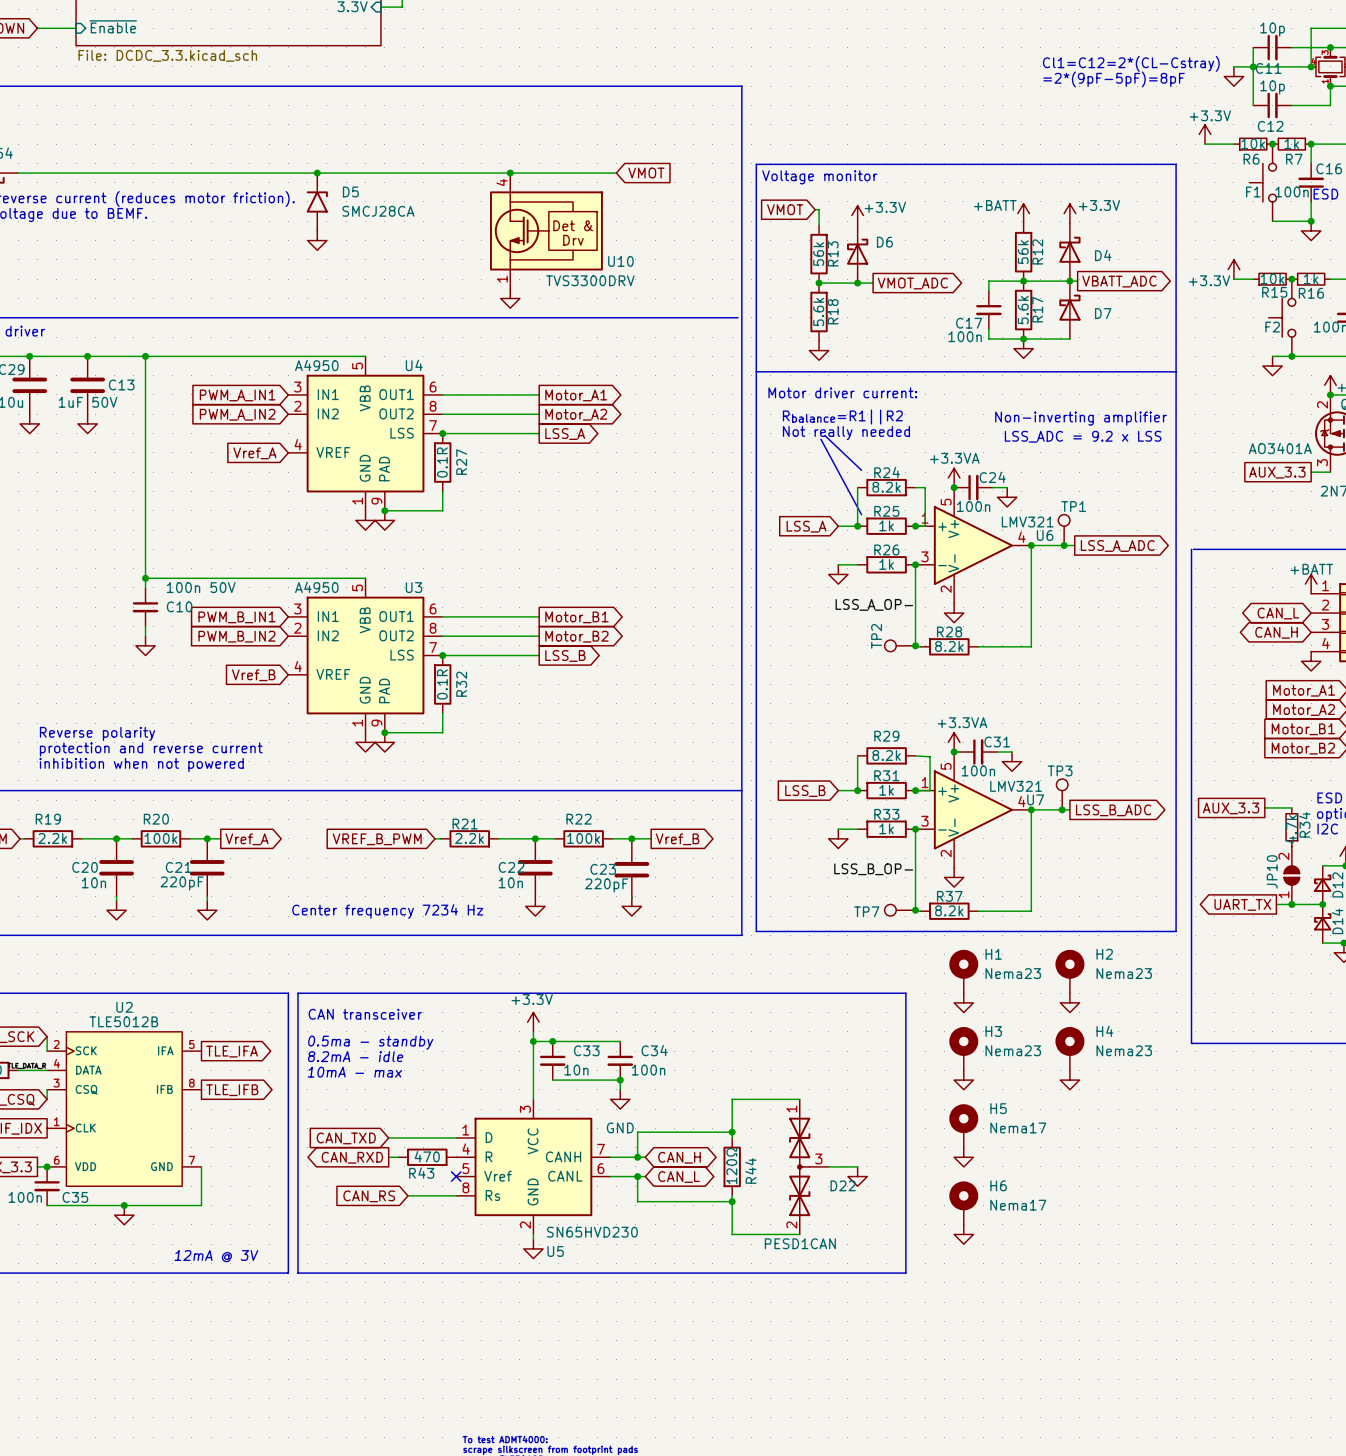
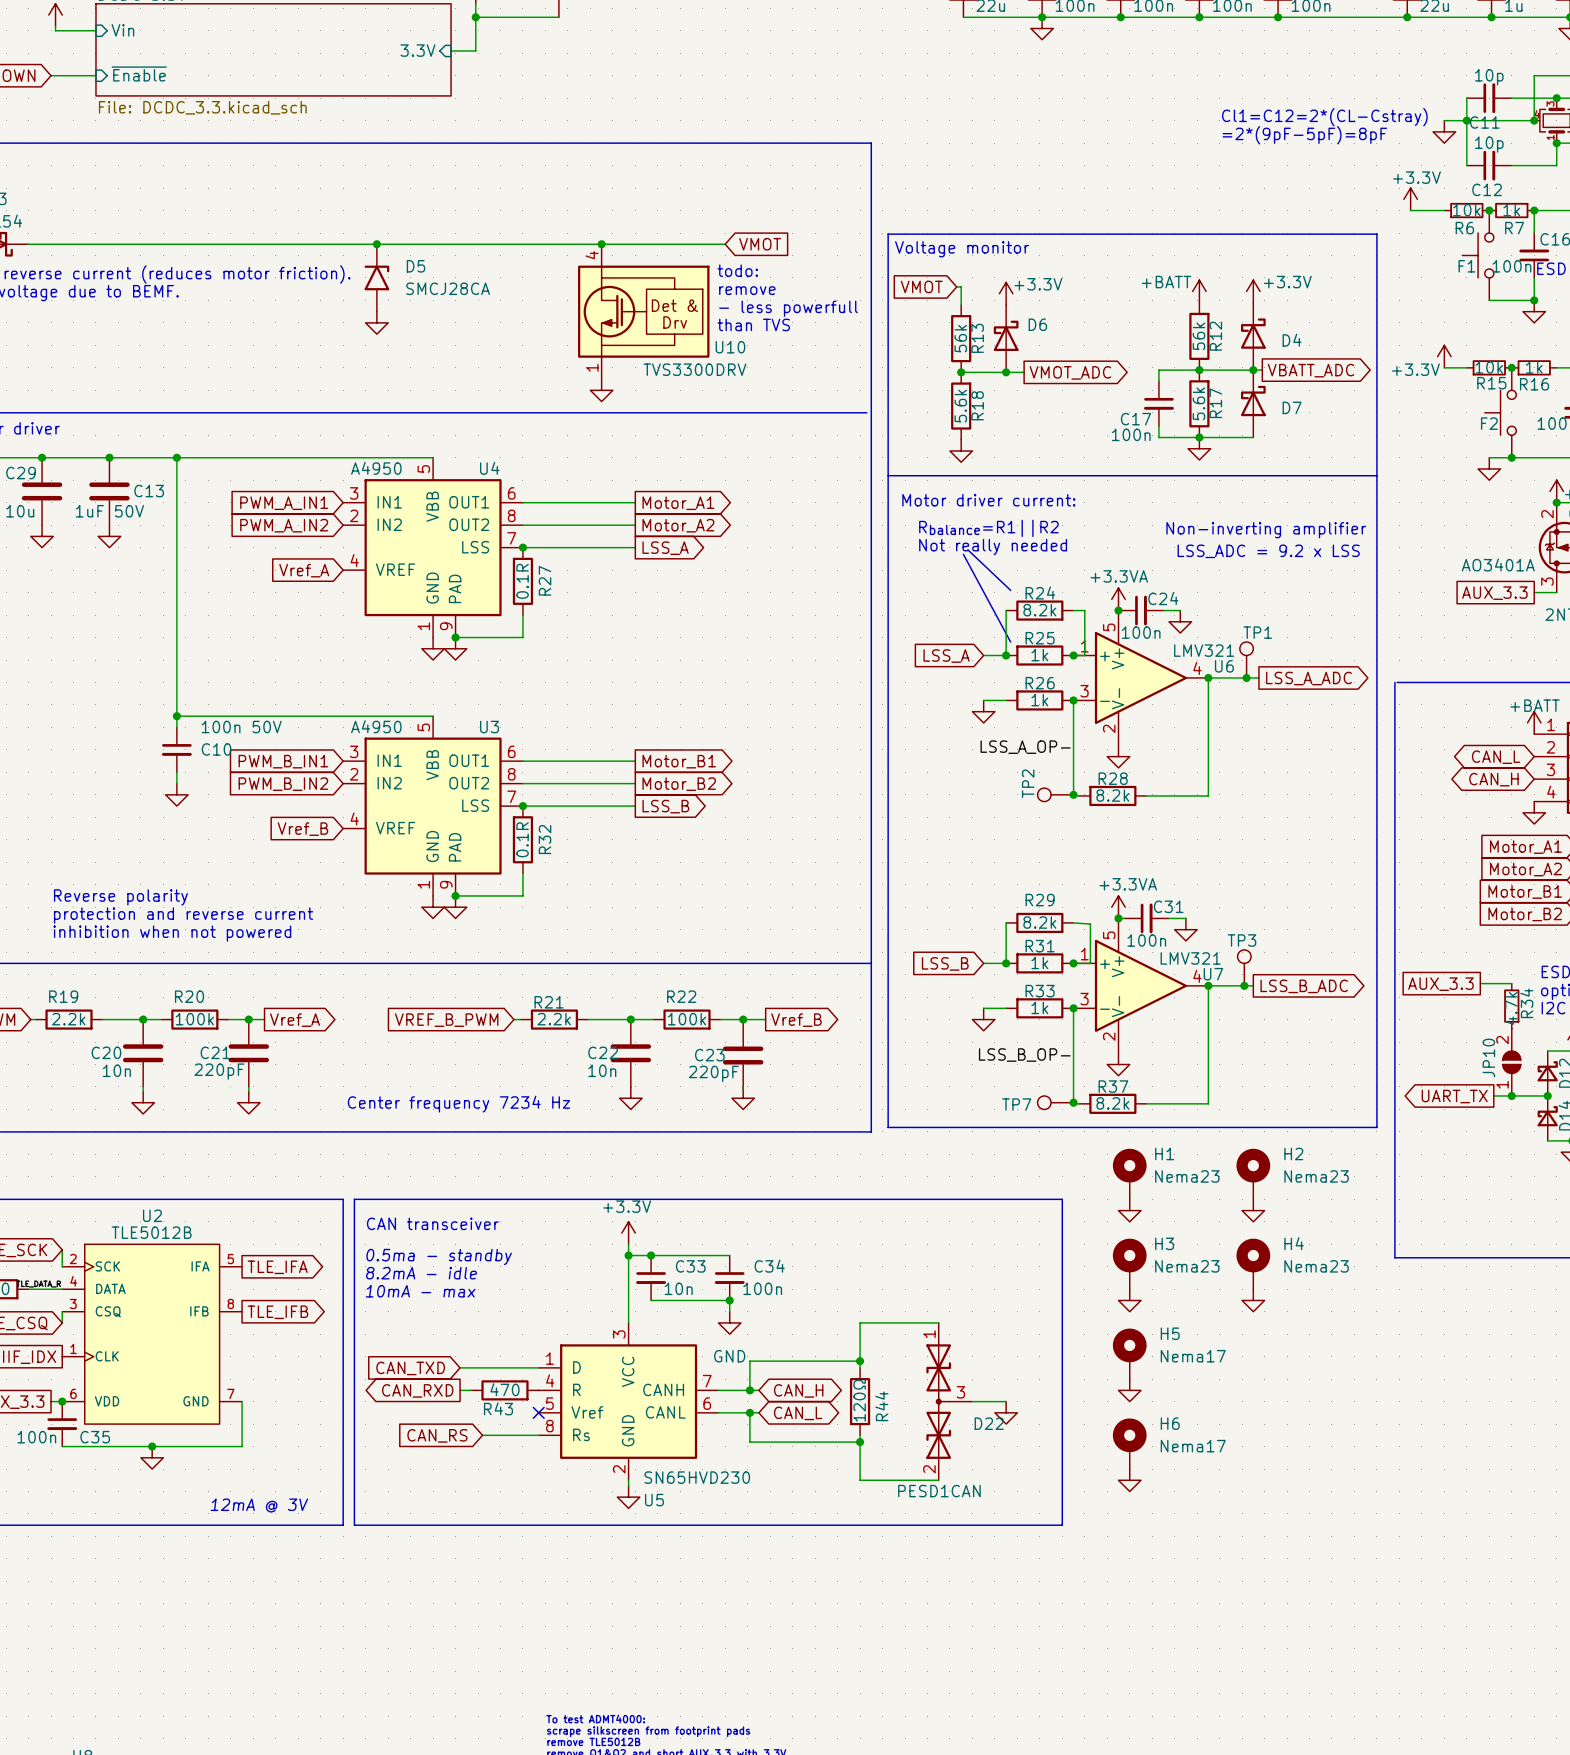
text: none -> todo: (737, 270)
text: none -> remove (747, 290)
text: none -> - less powerfull (788, 308)
text: none -> than TVS (753, 324)

